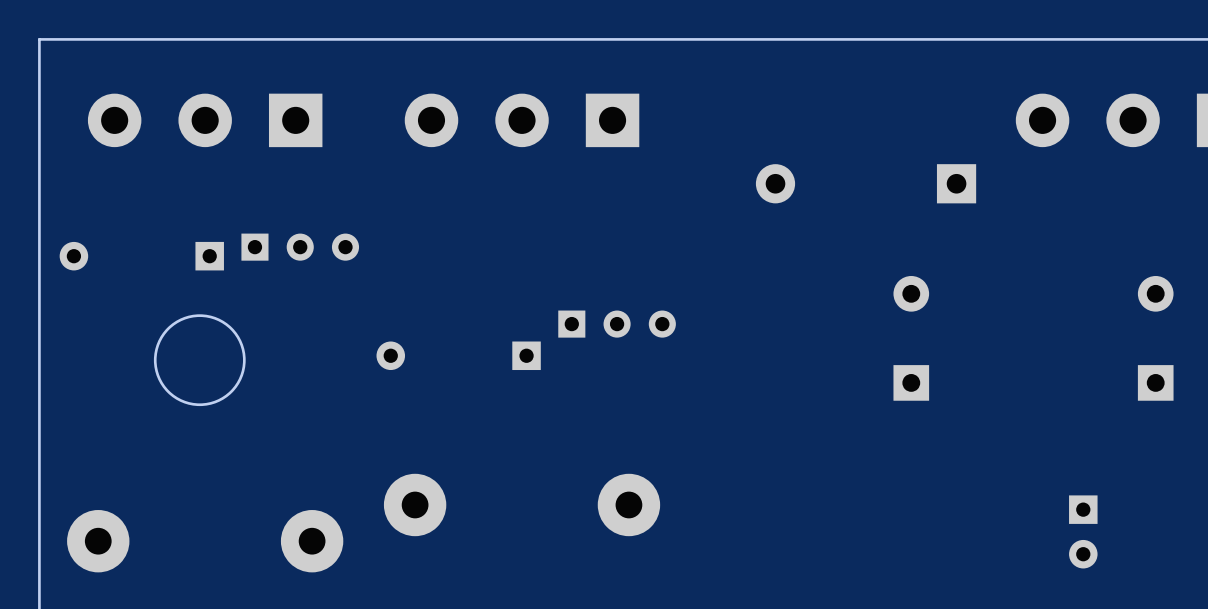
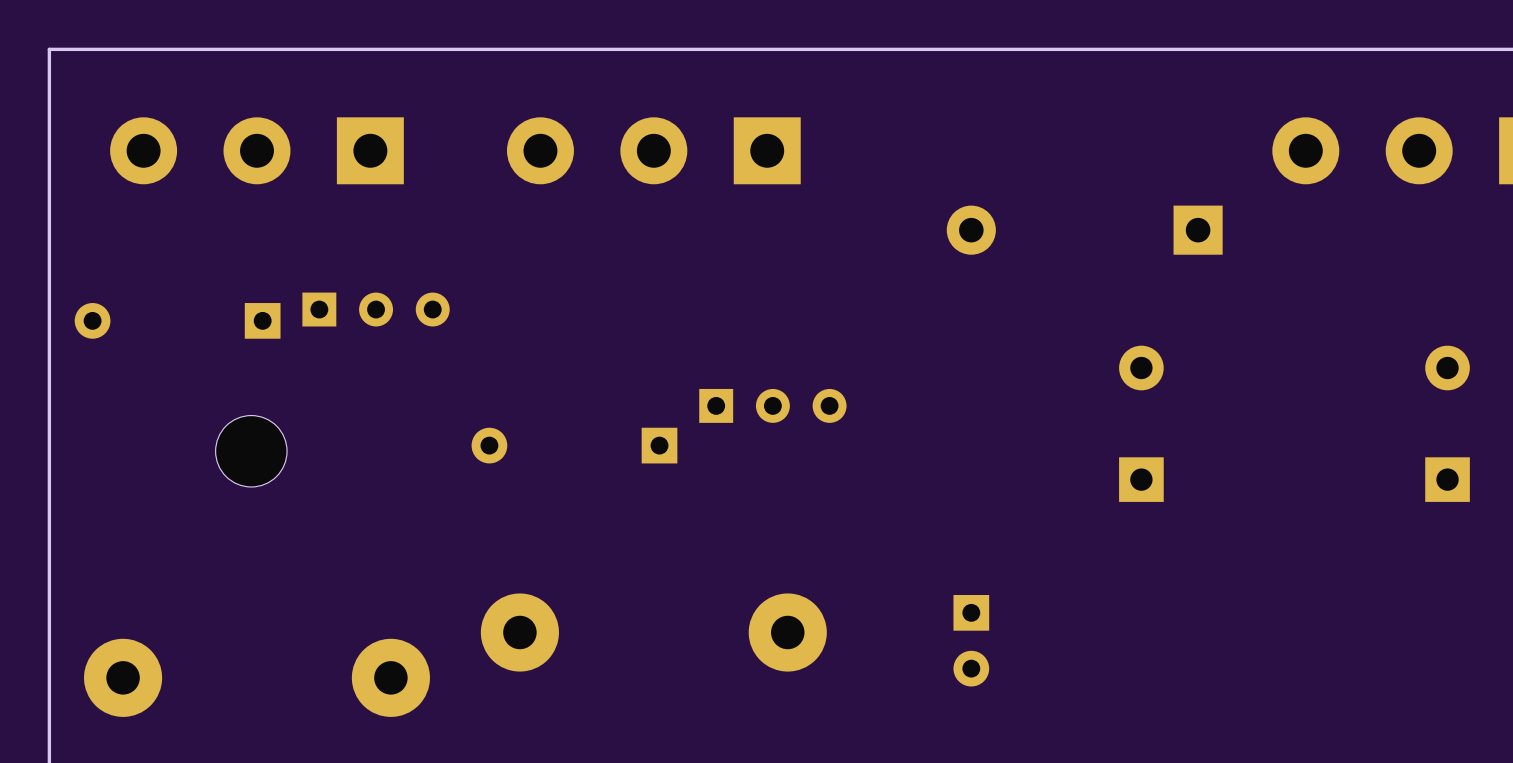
round board edge: [153, 314, 246, 407] -> none
part: none -> (251, 451)
part position: (1083, 531) -> (971, 640)

